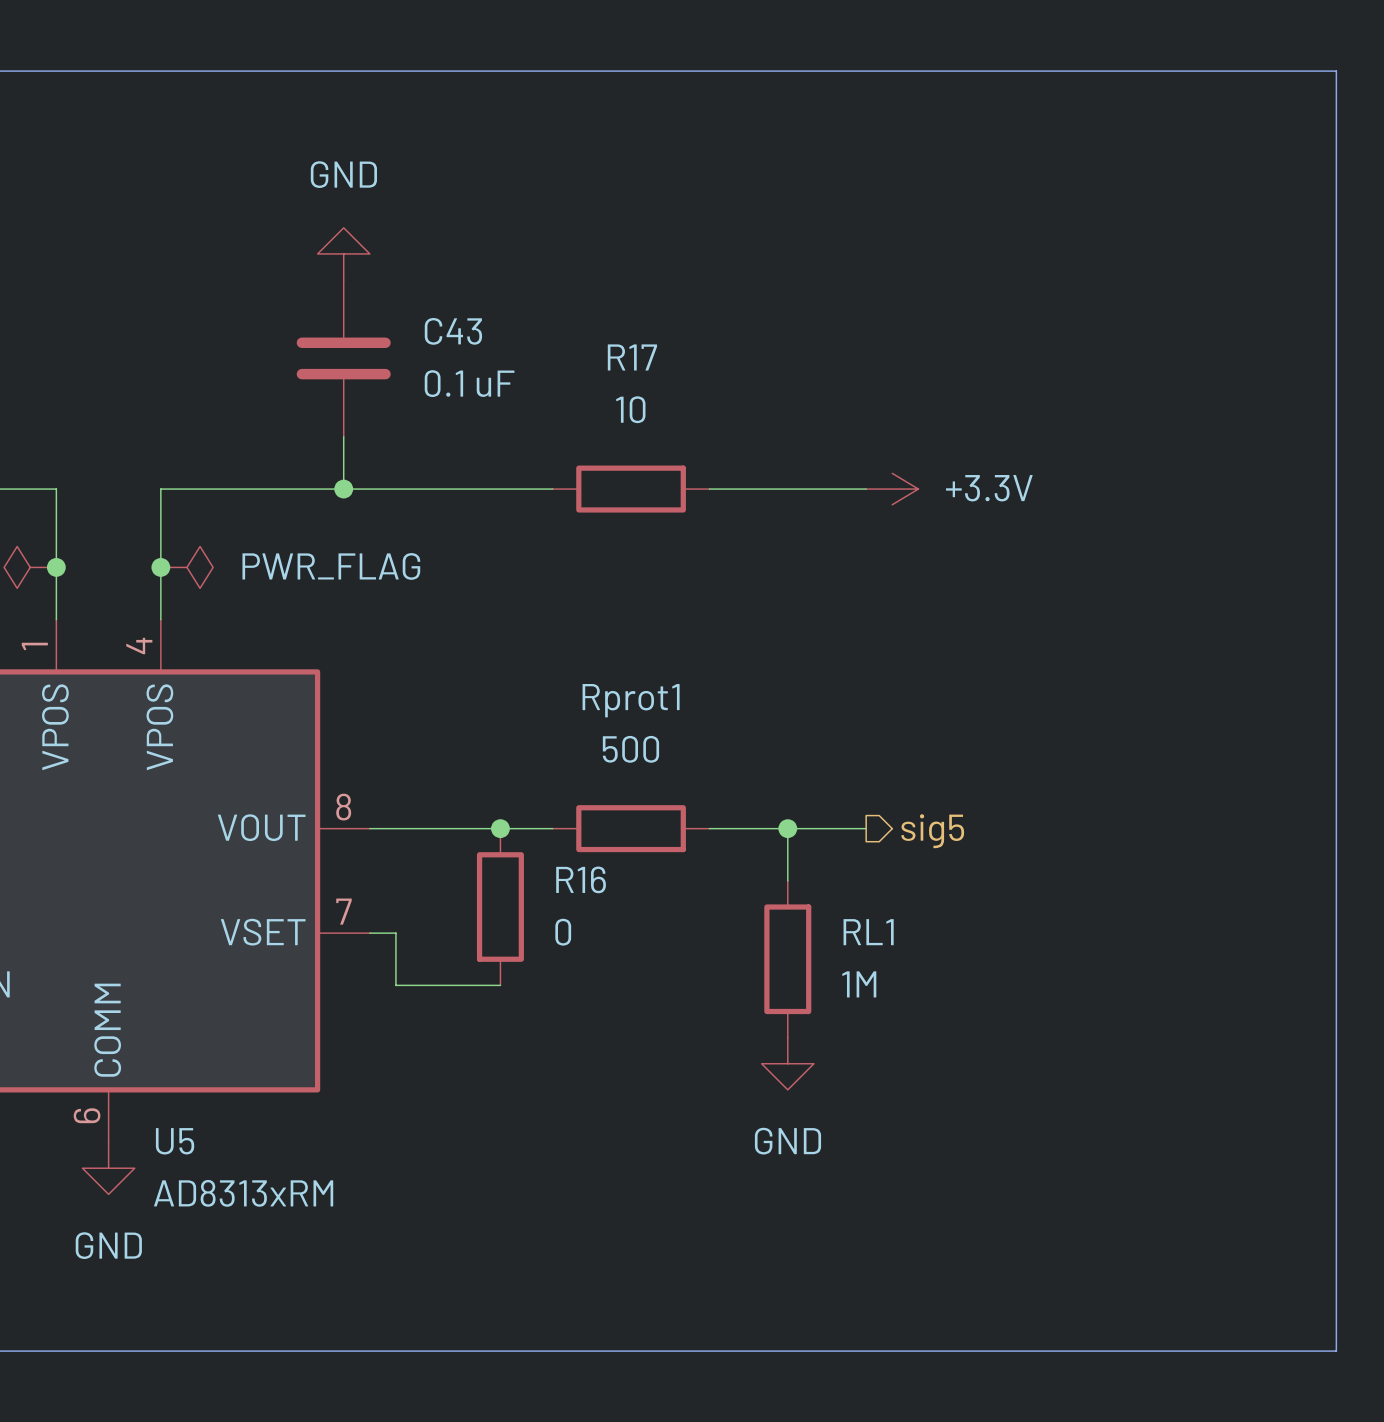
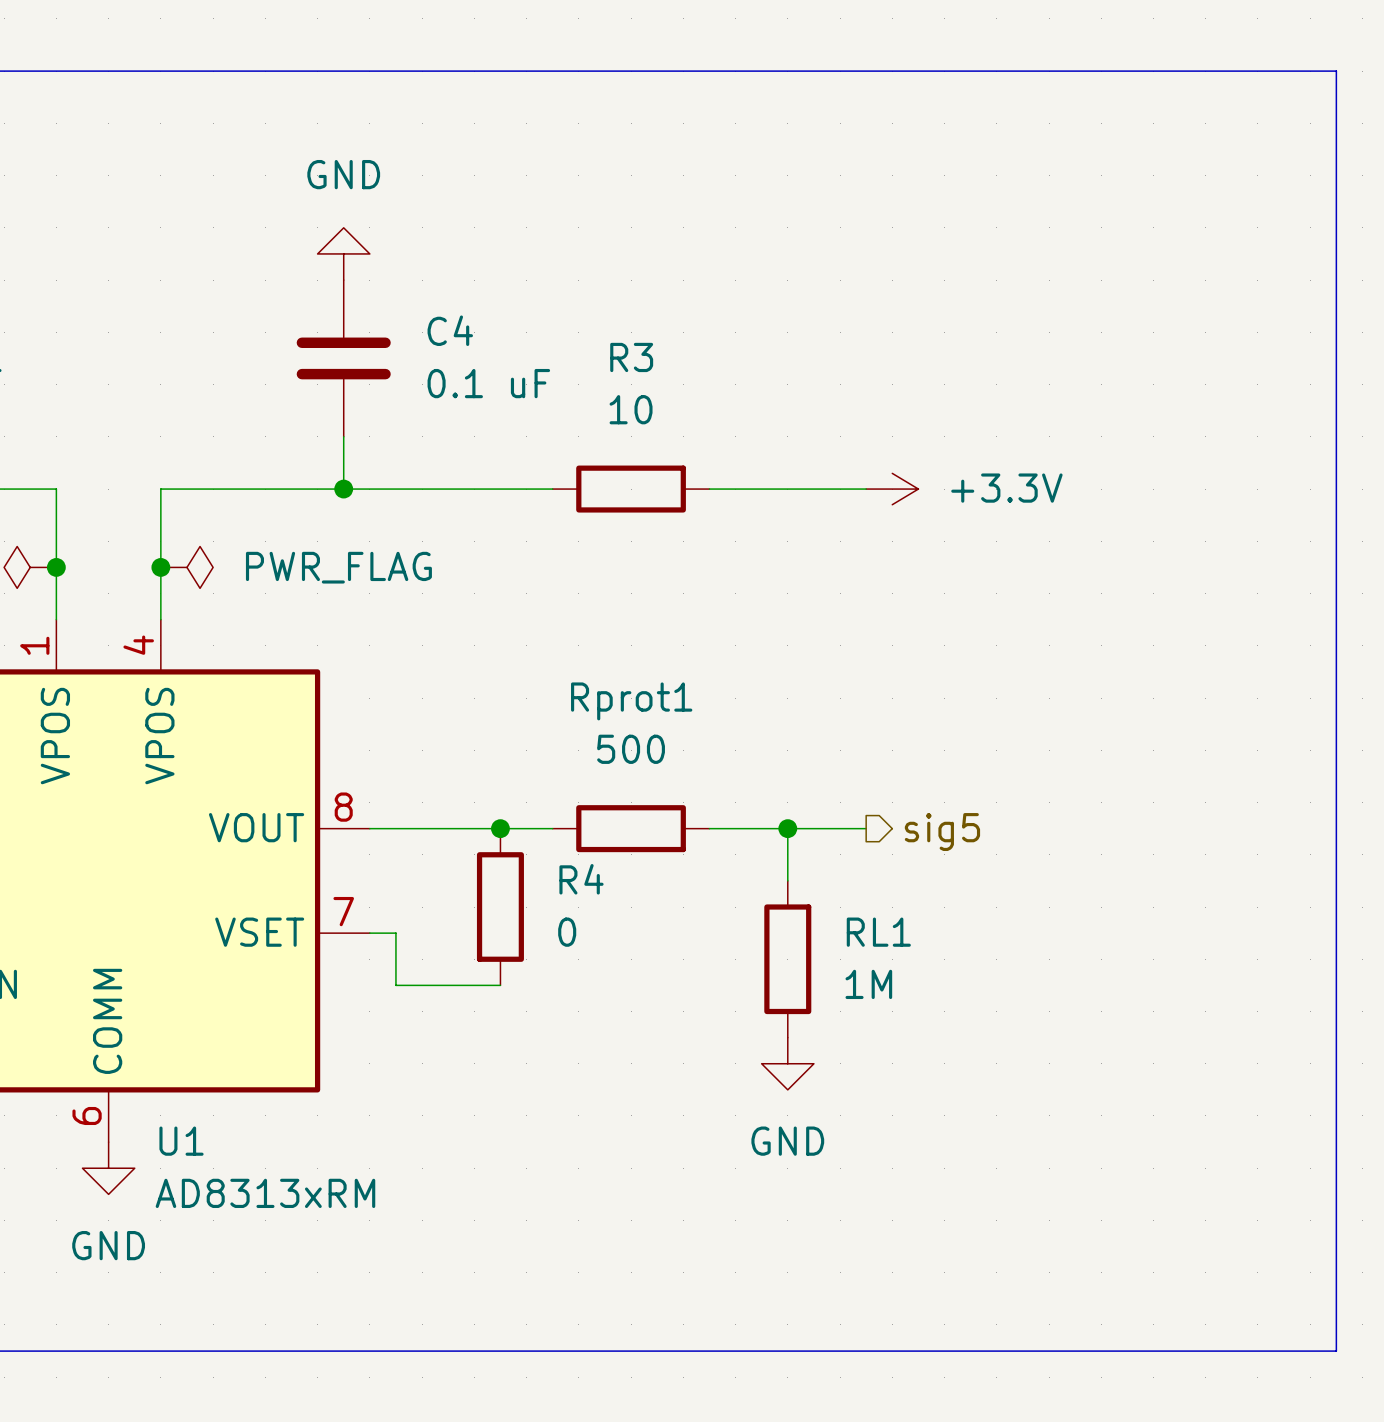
C43 name: C43 (453, 331) -> C4 (450, 330)
R17 name: R17 (632, 357) -> R3 (631, 357)
R16 name: R16 (581, 879) -> R4 (581, 879)
U5 name: U5 (175, 1141) -> U1 (181, 1141)

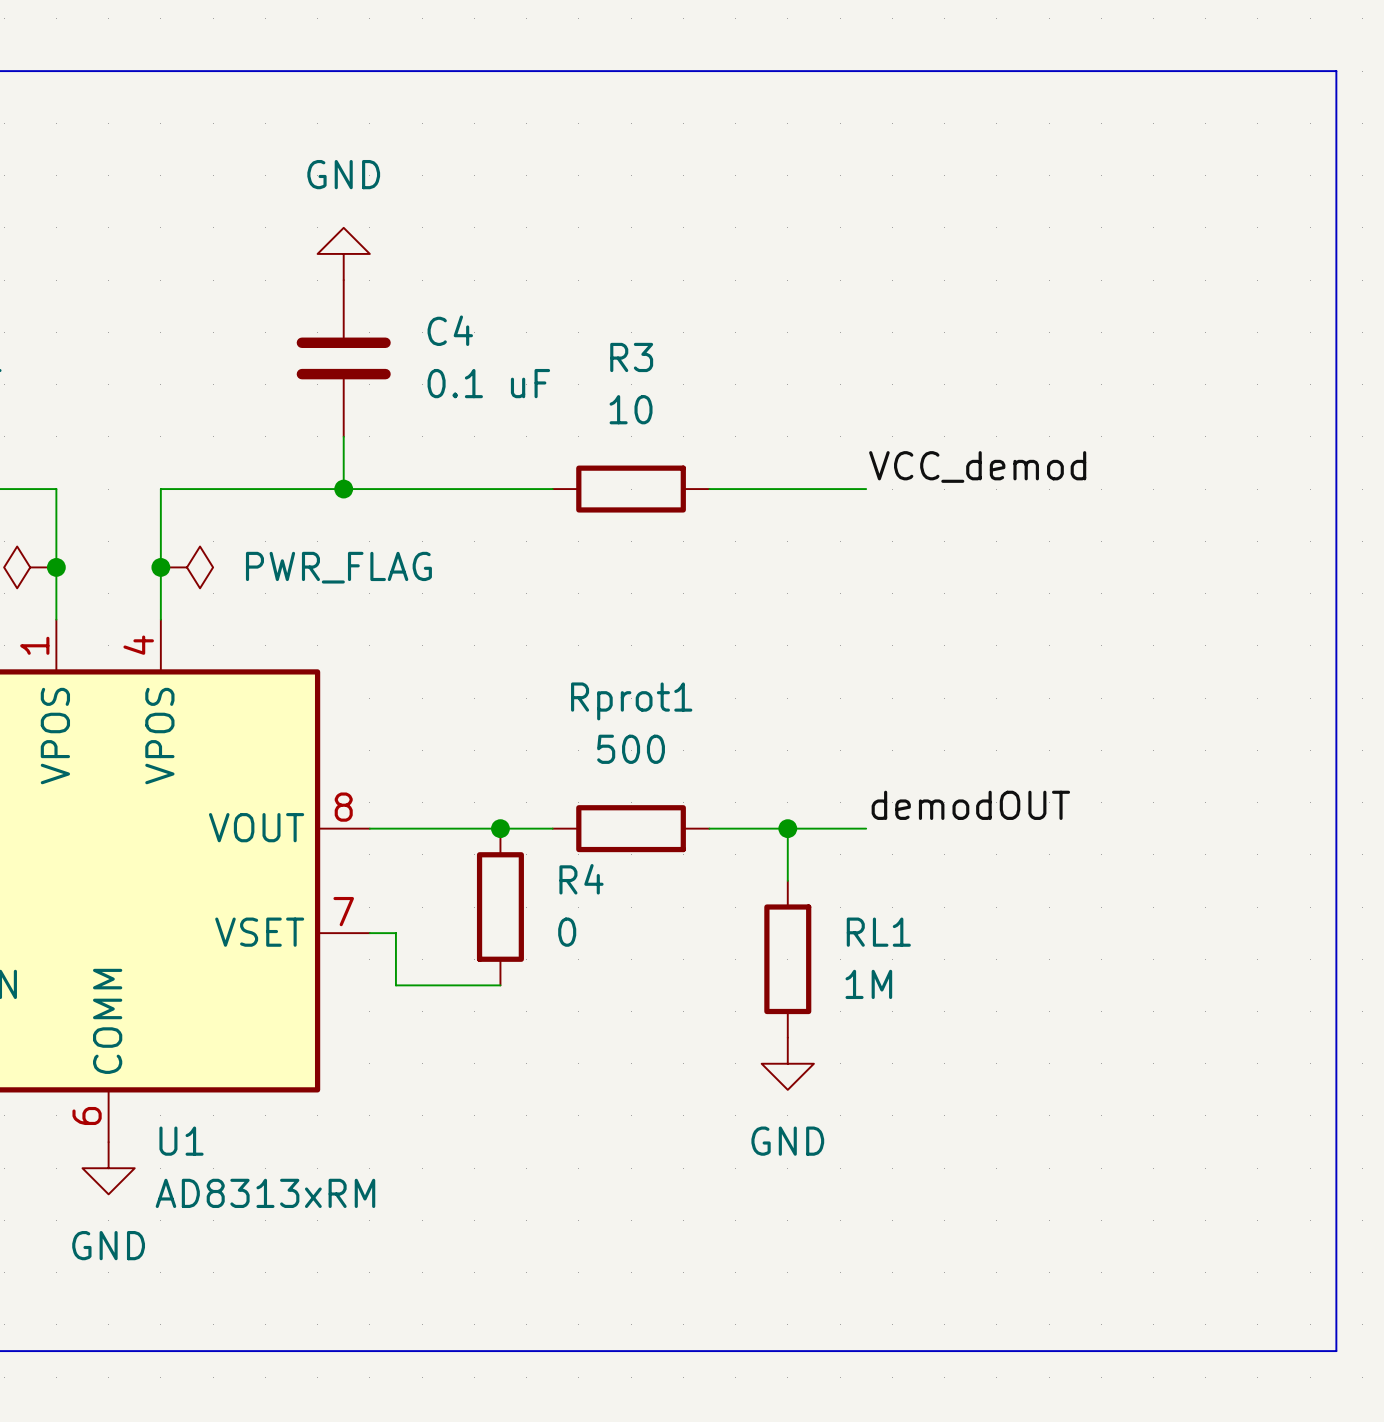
label: none -> VCC_demod (977, 466)
power symbol: +3.3V (892, 489) -> none
label: none -> demodOUT (970, 805)
hierarchical label: sig5 (942, 832) -> none

